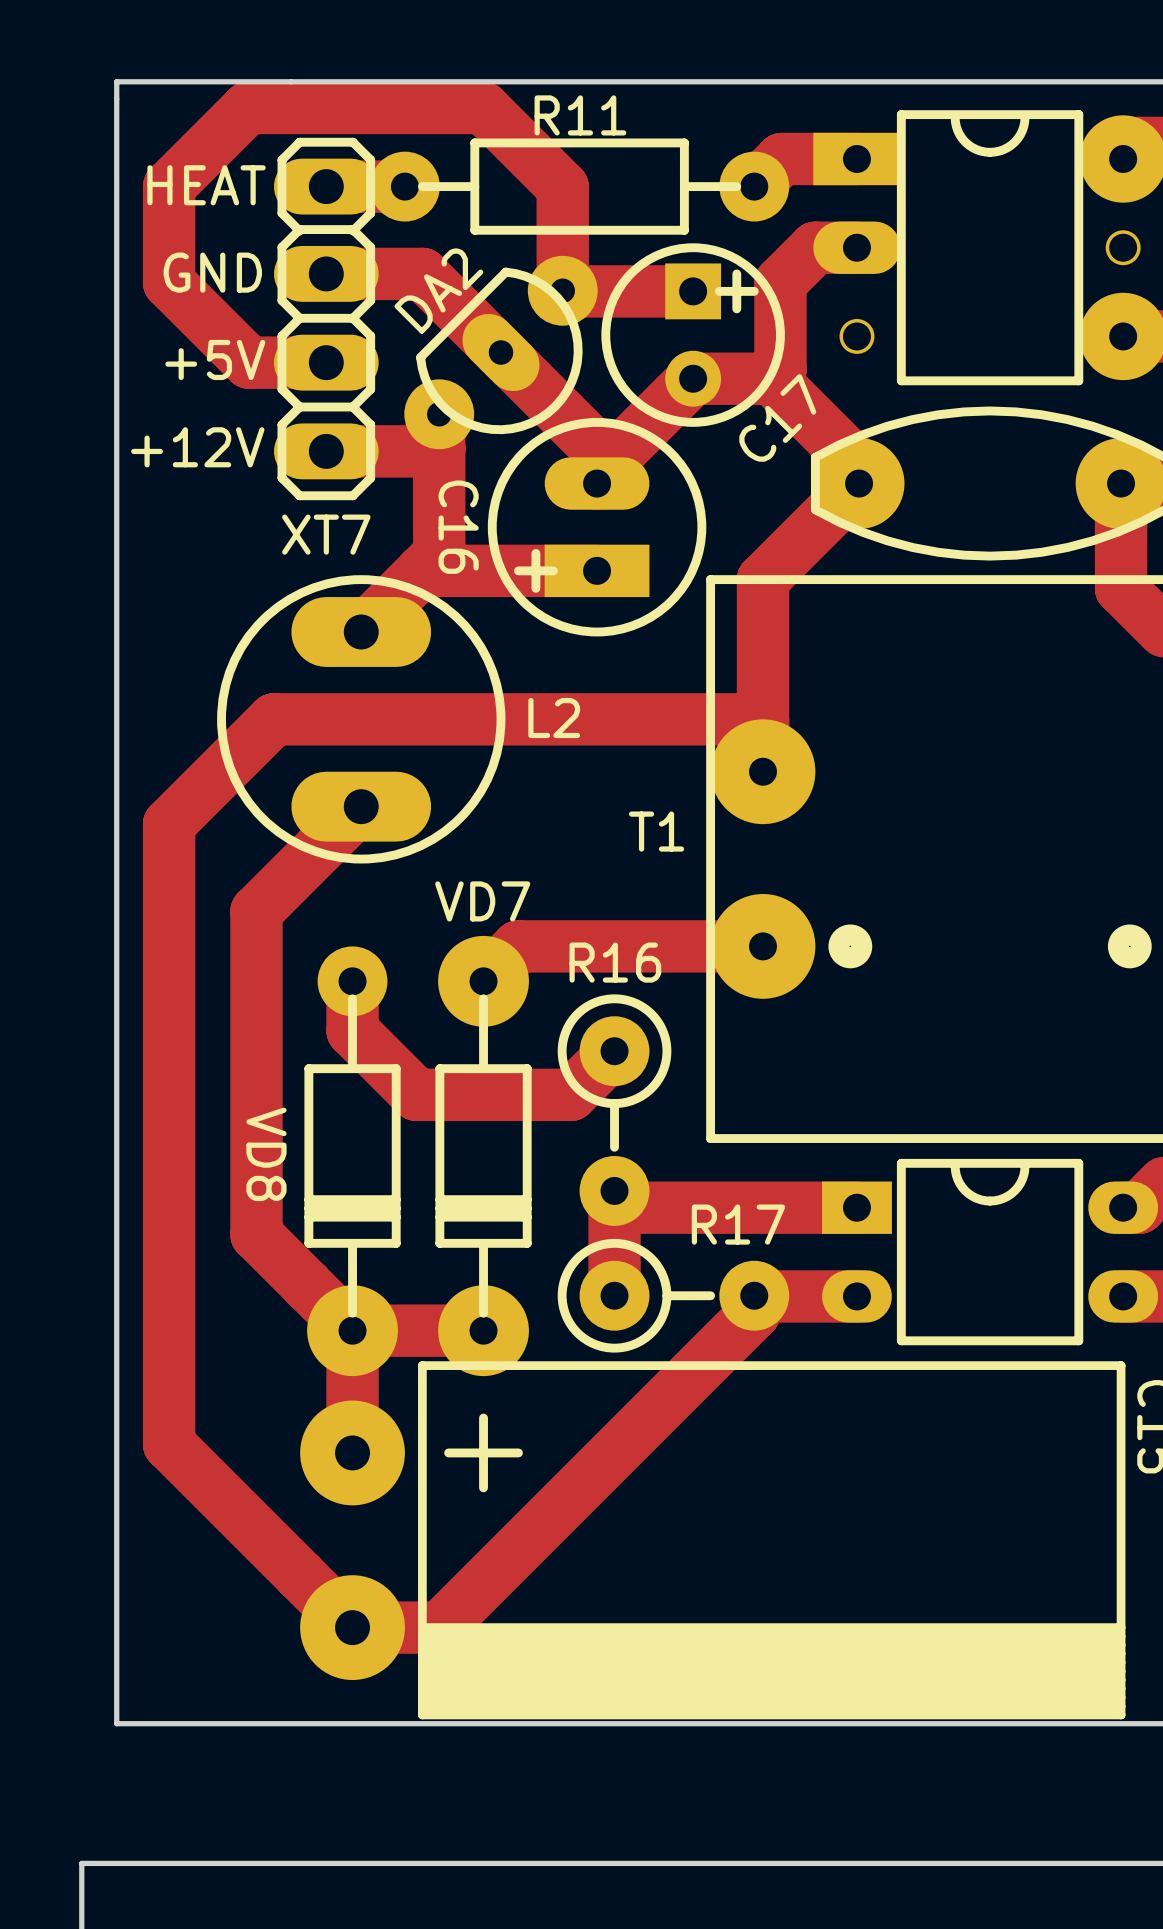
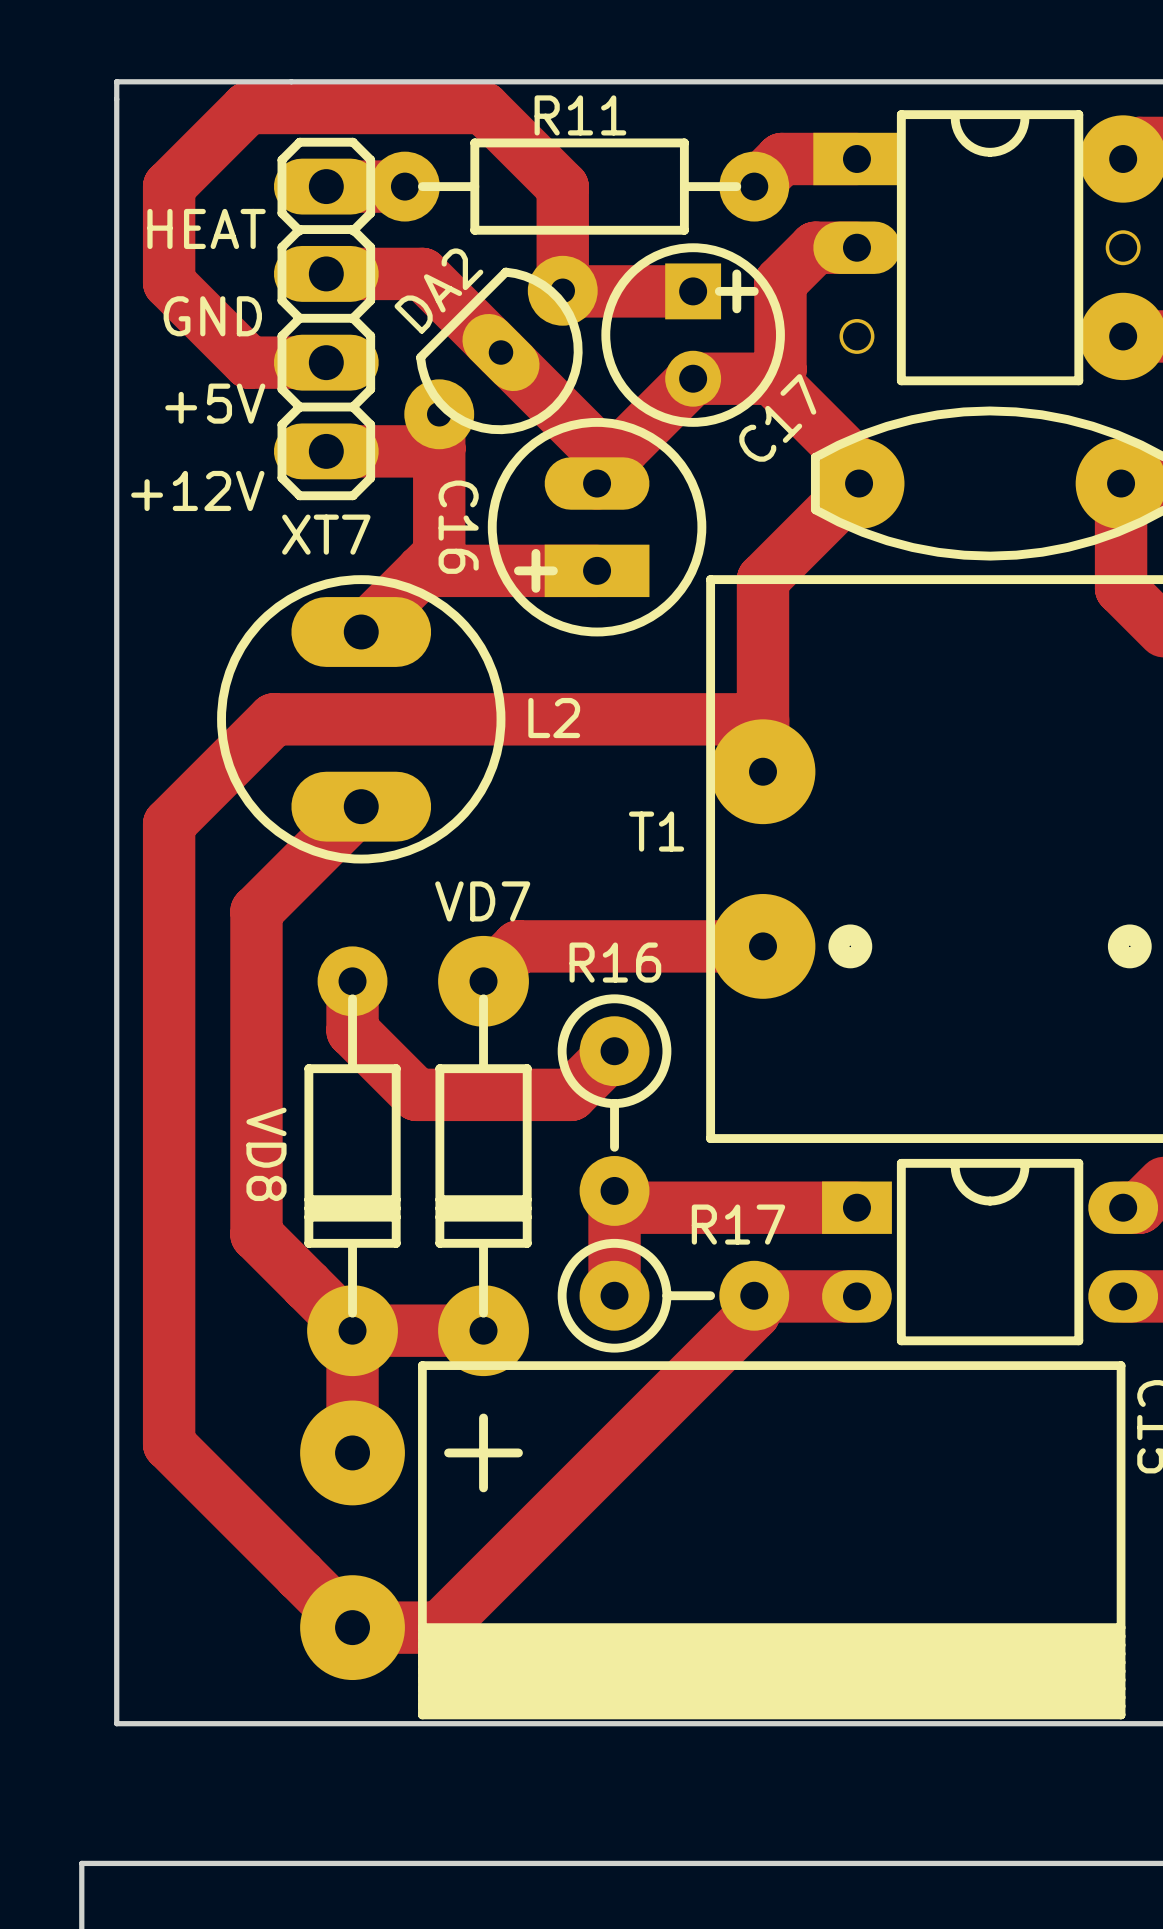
text position: HEAT (206, 185) -> HEAT (206, 228)
text position: GND (212, 272) -> GND (212, 316)
text position: +5V (215, 359) -> +5V (215, 403)
text position: +12V (197, 447) -> +12V (197, 490)

